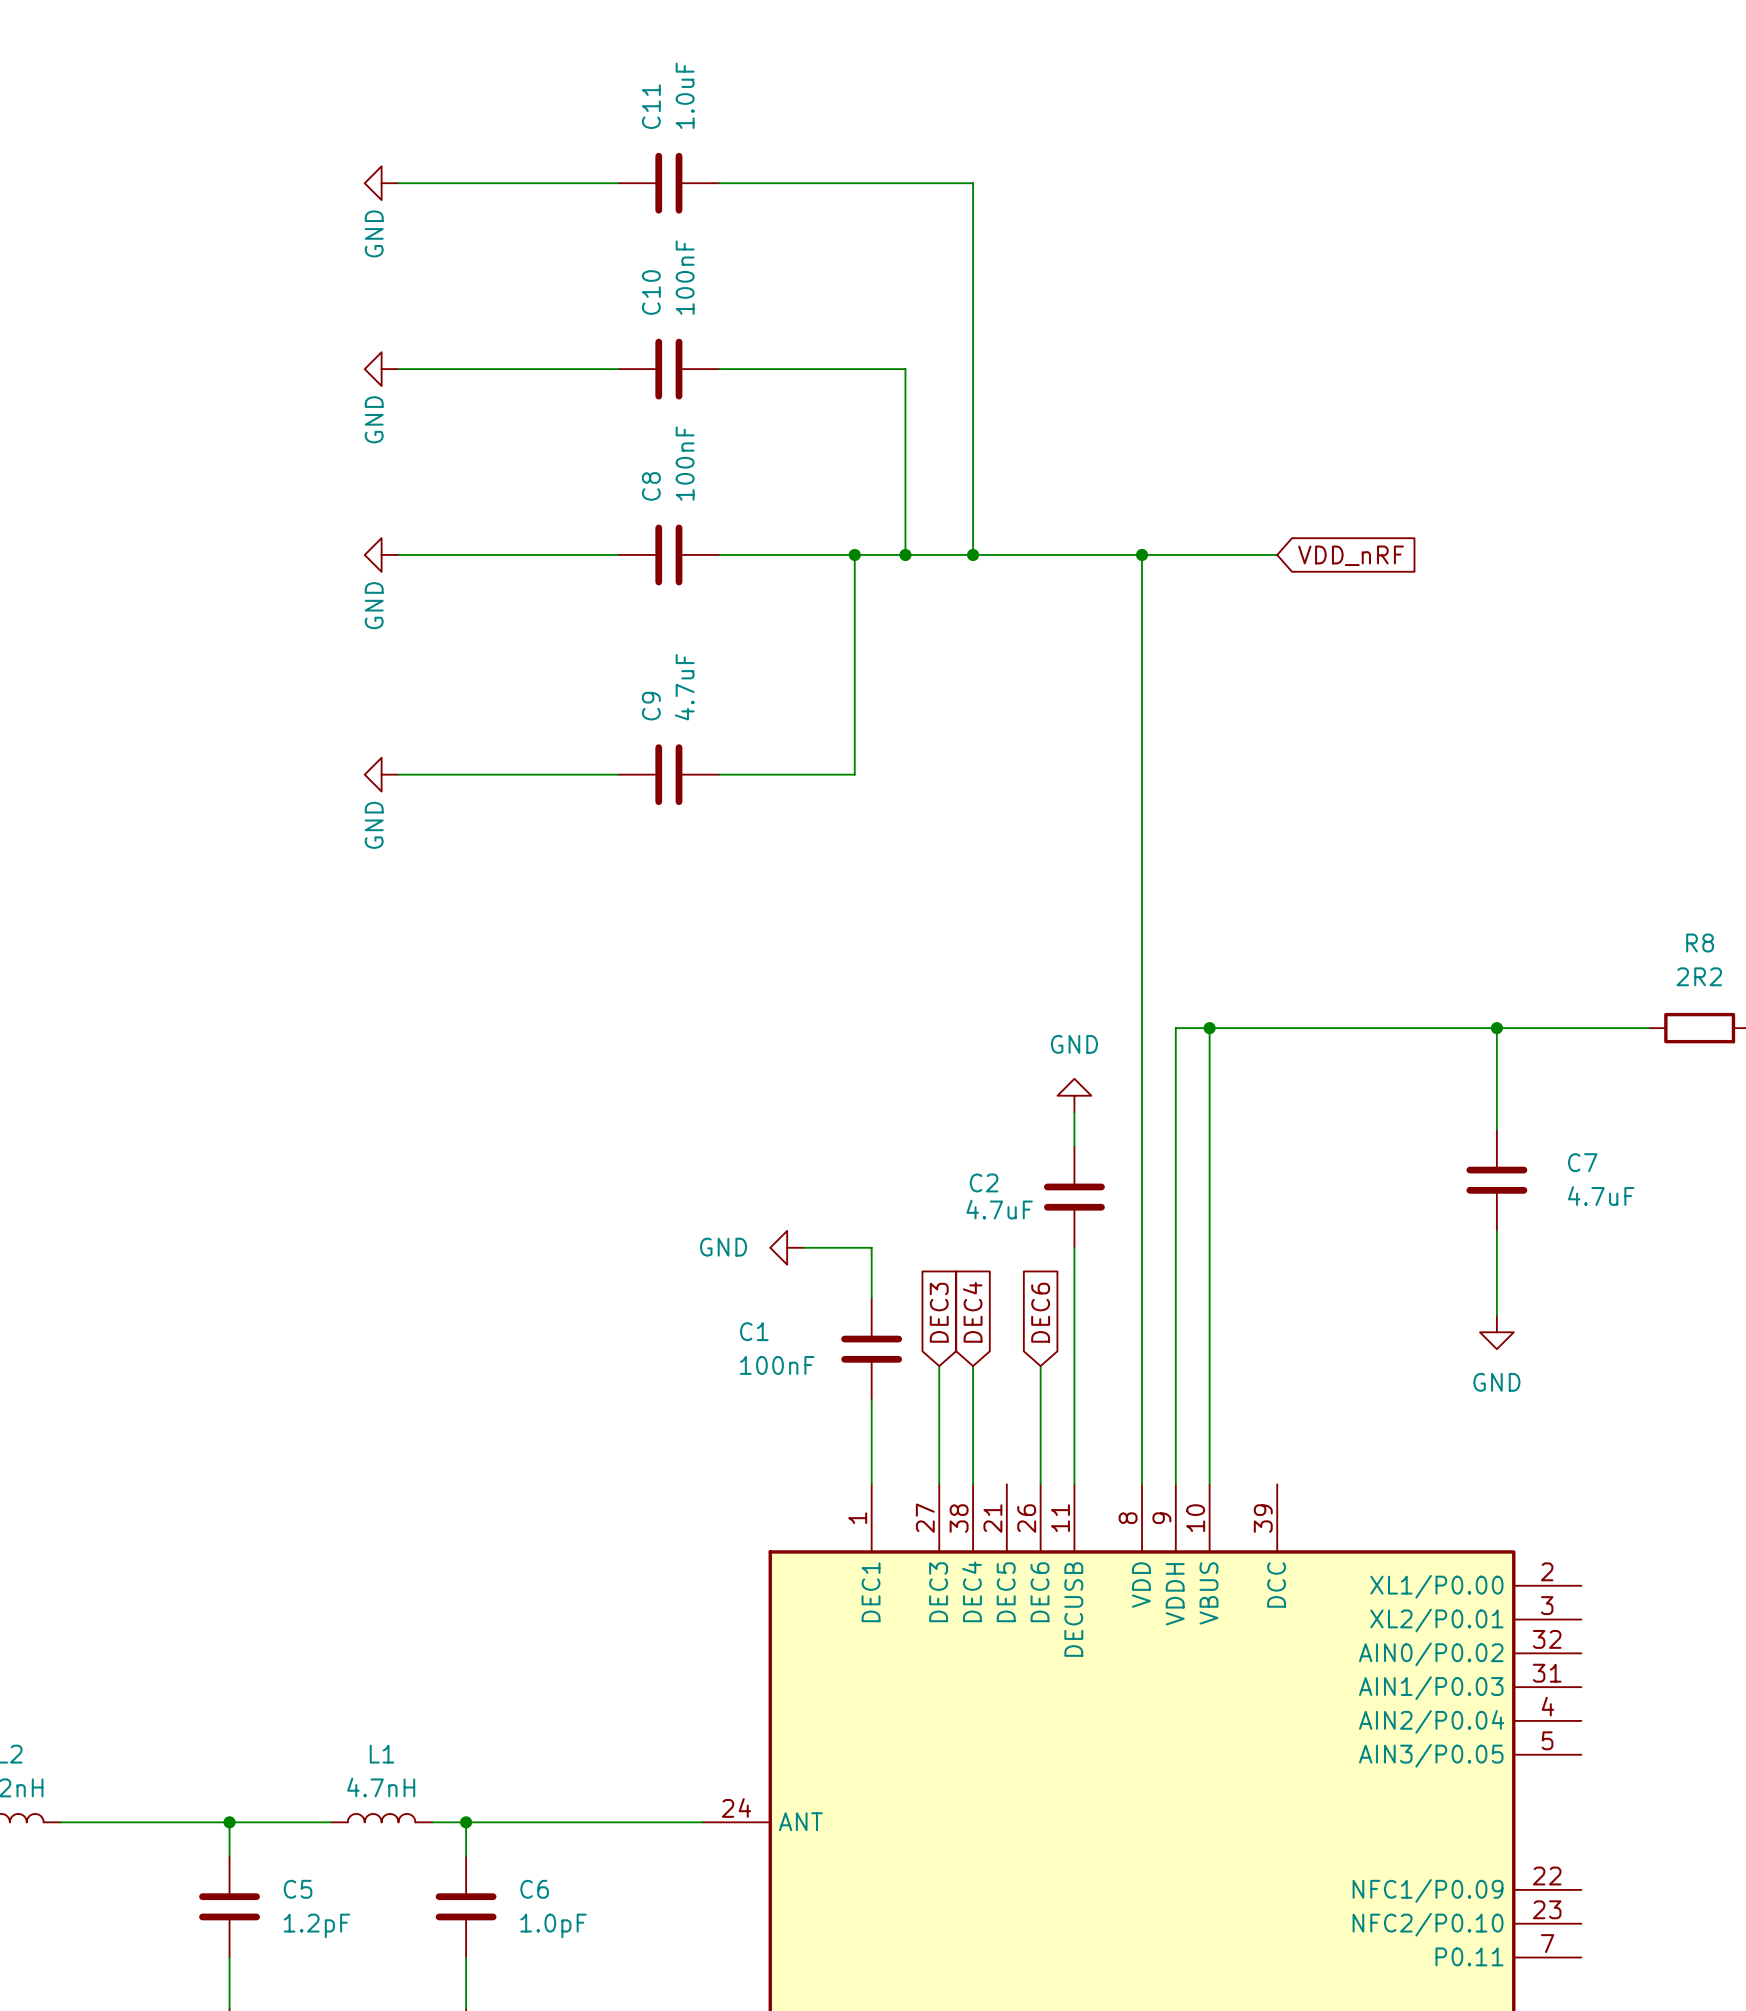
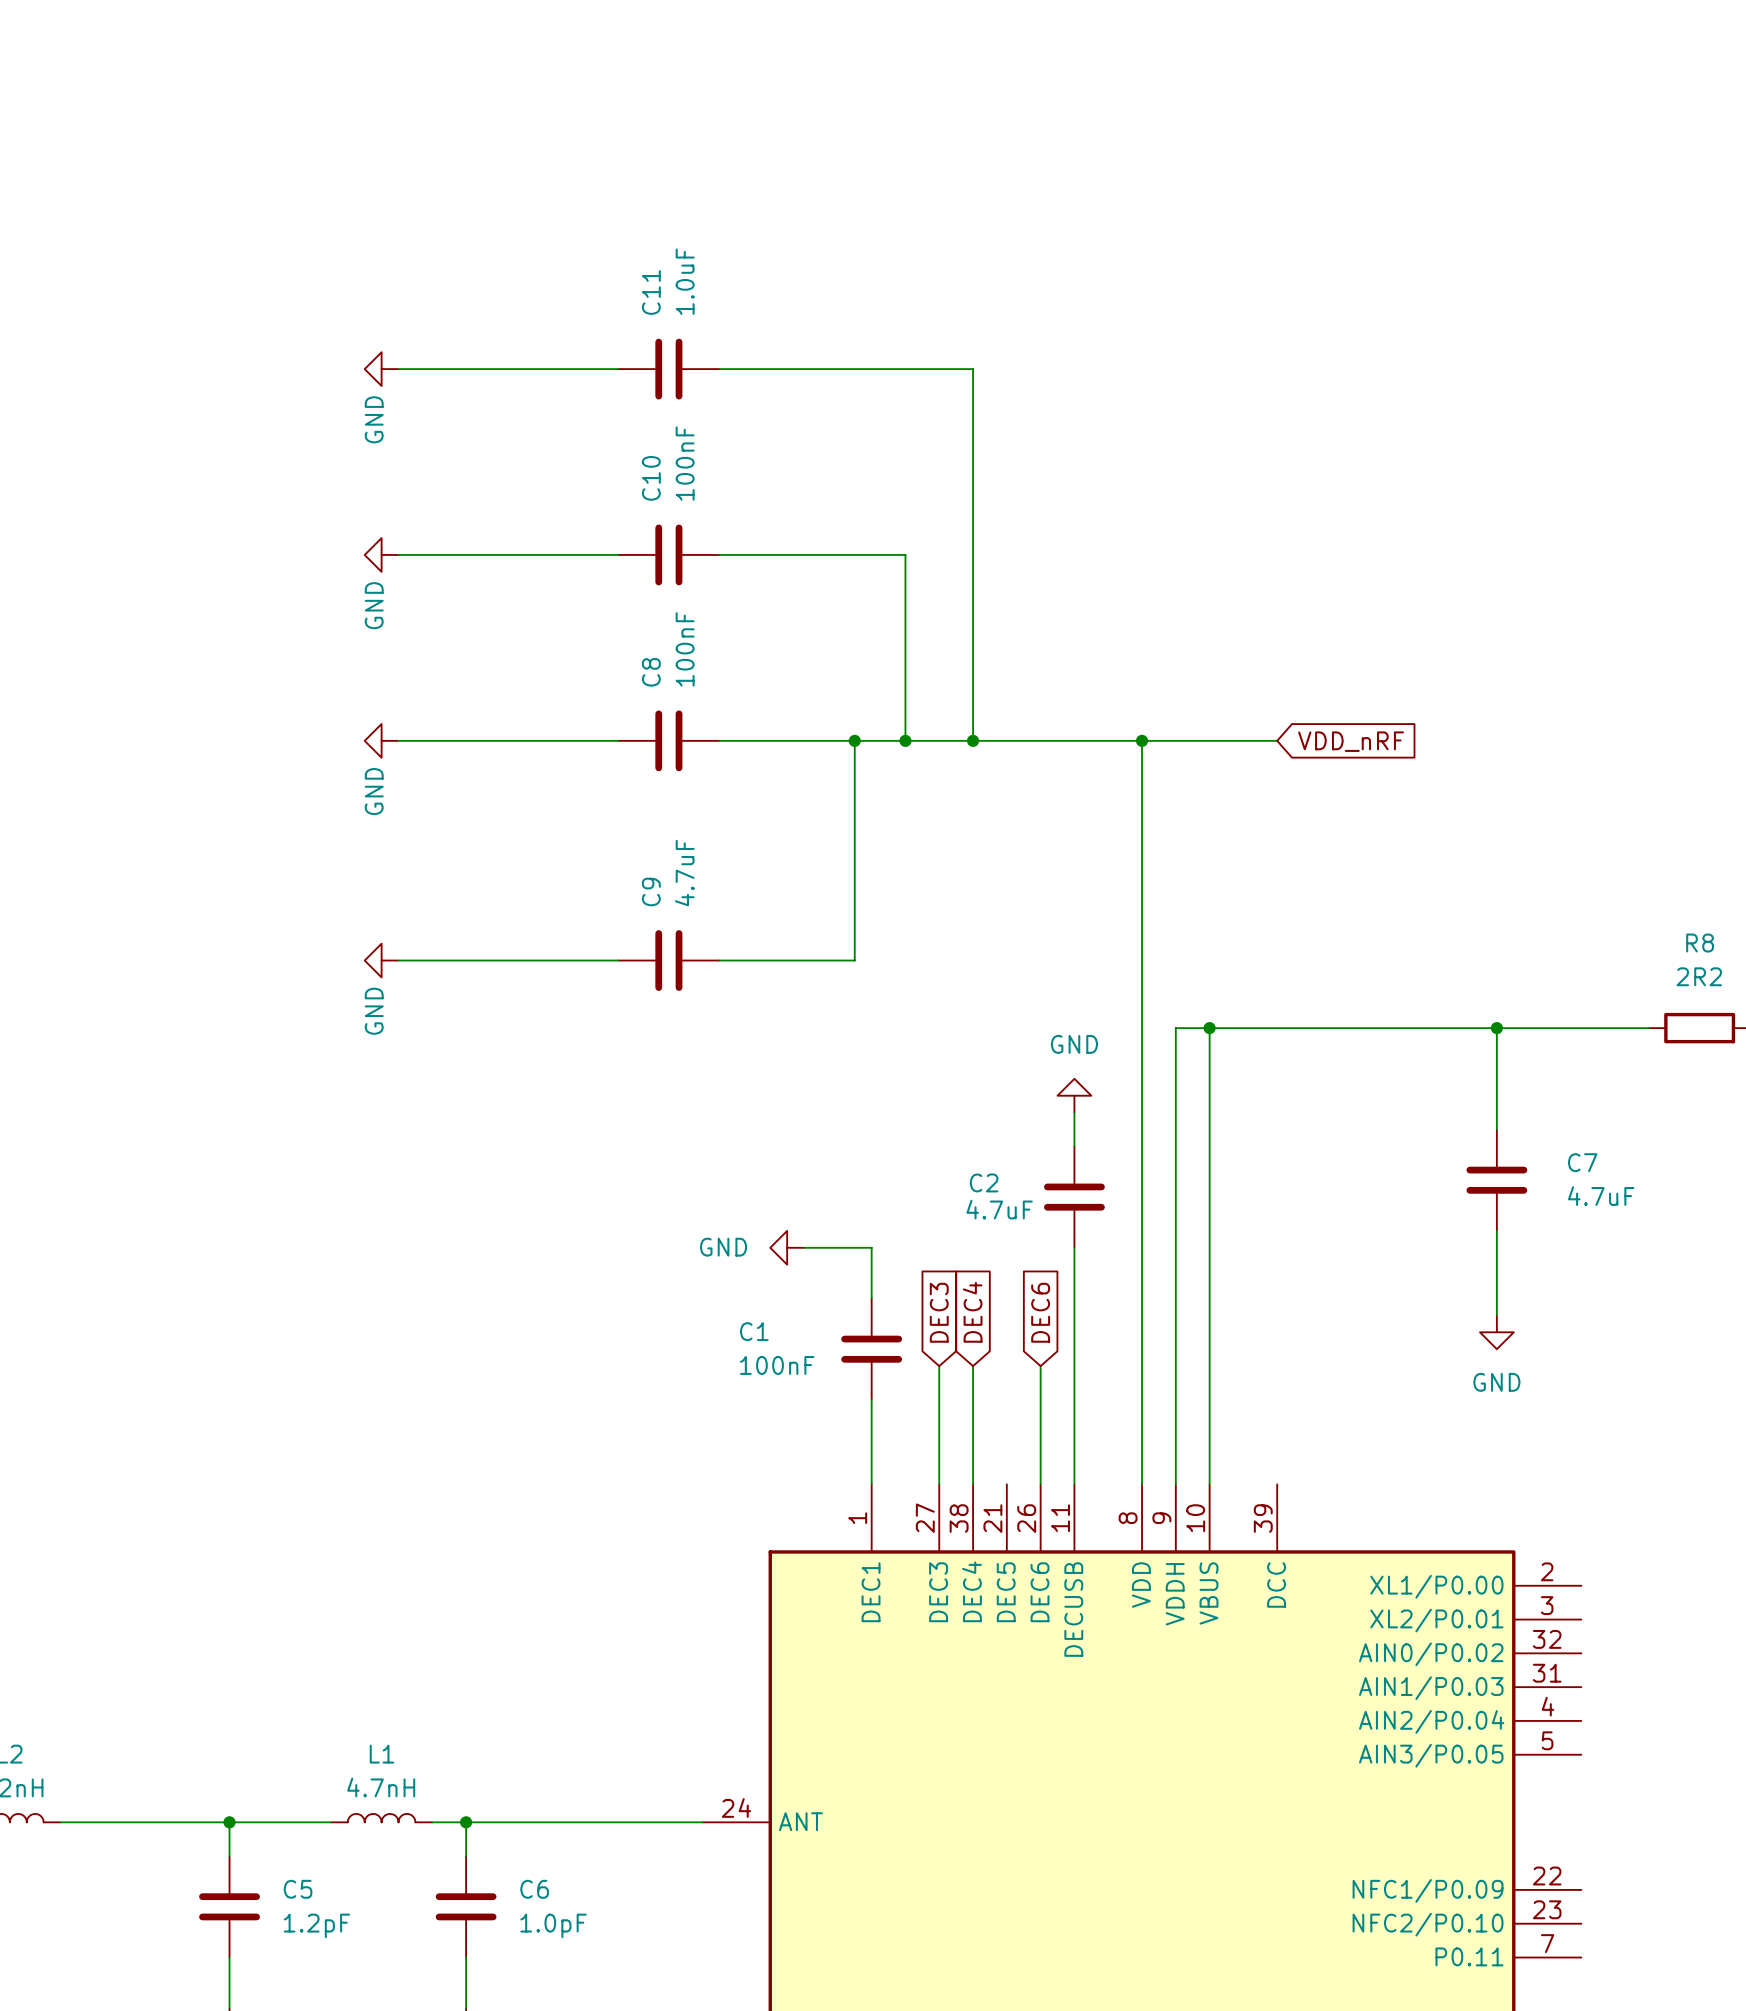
power symbol: GND (381, 183) -> none
wire: (398, 183) (618, 183) -> none
C11: 1.0uF (668, 183) -> none
wire: (719, 183) (973, 183) (973, 369) -> (905, 369) (973, 369)
C10 value: 100nF (685, 277) -> 1.0uF (685, 281)
C10 name: C10 (651, 292) -> C11 (651, 292)
wire: (905, 369) (905, 554) (1277, 554) -> none
C8 name: C8 (651, 486) -> C10 (651, 478)
wire: (854, 554) (854, 740) -> (905, 554) (905, 740)
junction: (854, 554) -> none
junction: (905, 554) -> none
junction: (973, 554) -> none
wire: (1142, 554) (1142, 740) -> (973, 554) (973, 740)
junction: (1142, 554) -> none
global label position: VDD_nRF (1351, 555) -> VDD_nRF (1351, 741)
C8: none -> 100nF (668, 740)
wire: none -> (719, 740) (1277, 740)
junction: none -> (854, 740)
junction: none -> (905, 740)
junction: none -> (973, 740)
junction: none -> (1142, 740)
power symbol position: GND (381, 774) -> GND (381, 740)
wire: (398, 774) (618, 774) -> (398, 740) (618, 740)
C9 position: (668, 774) -> (668, 960)
wire: (719, 774) (854, 774) -> (719, 960) (854, 960) (854, 774)
power symbol: none -> GND (381, 960)
wire: none -> (398, 960) (618, 960)

